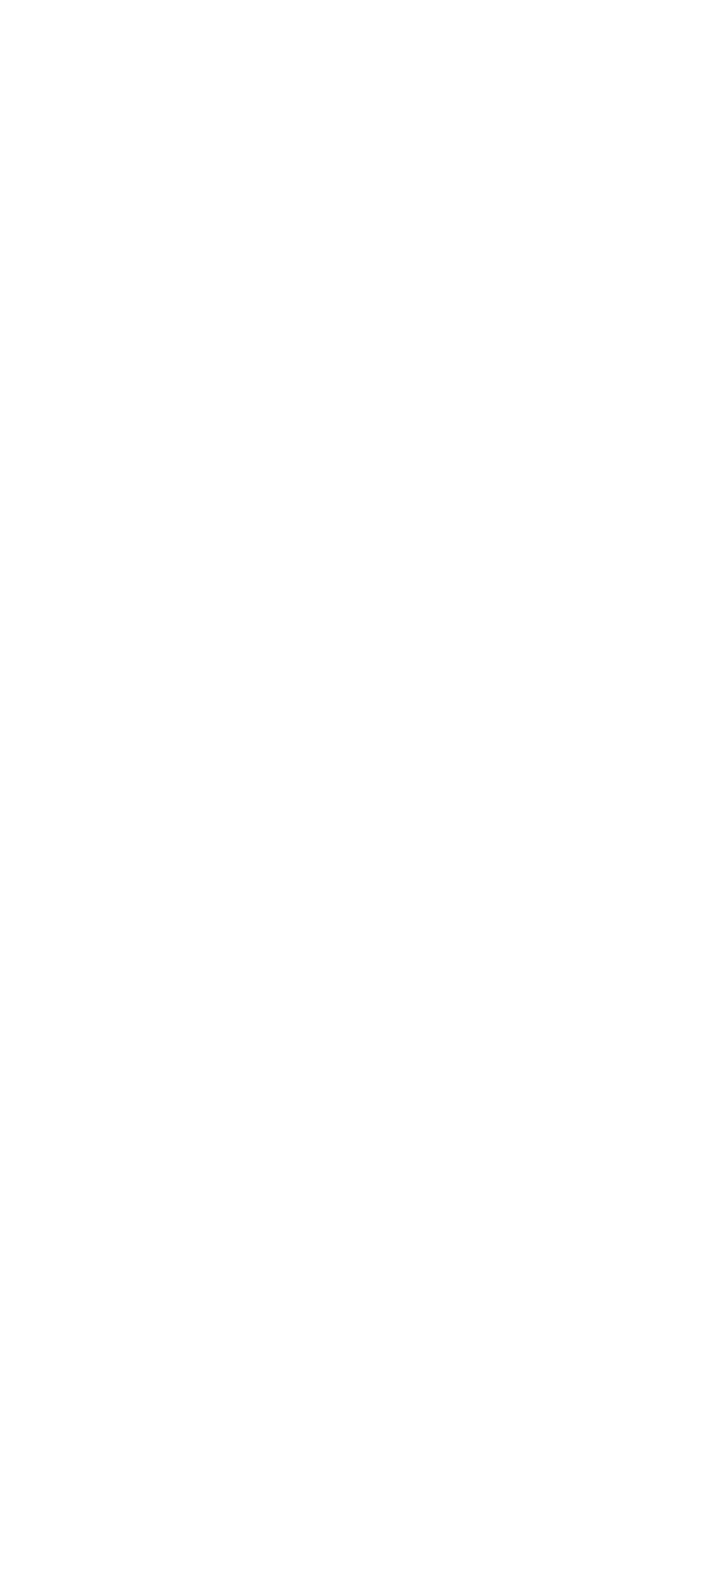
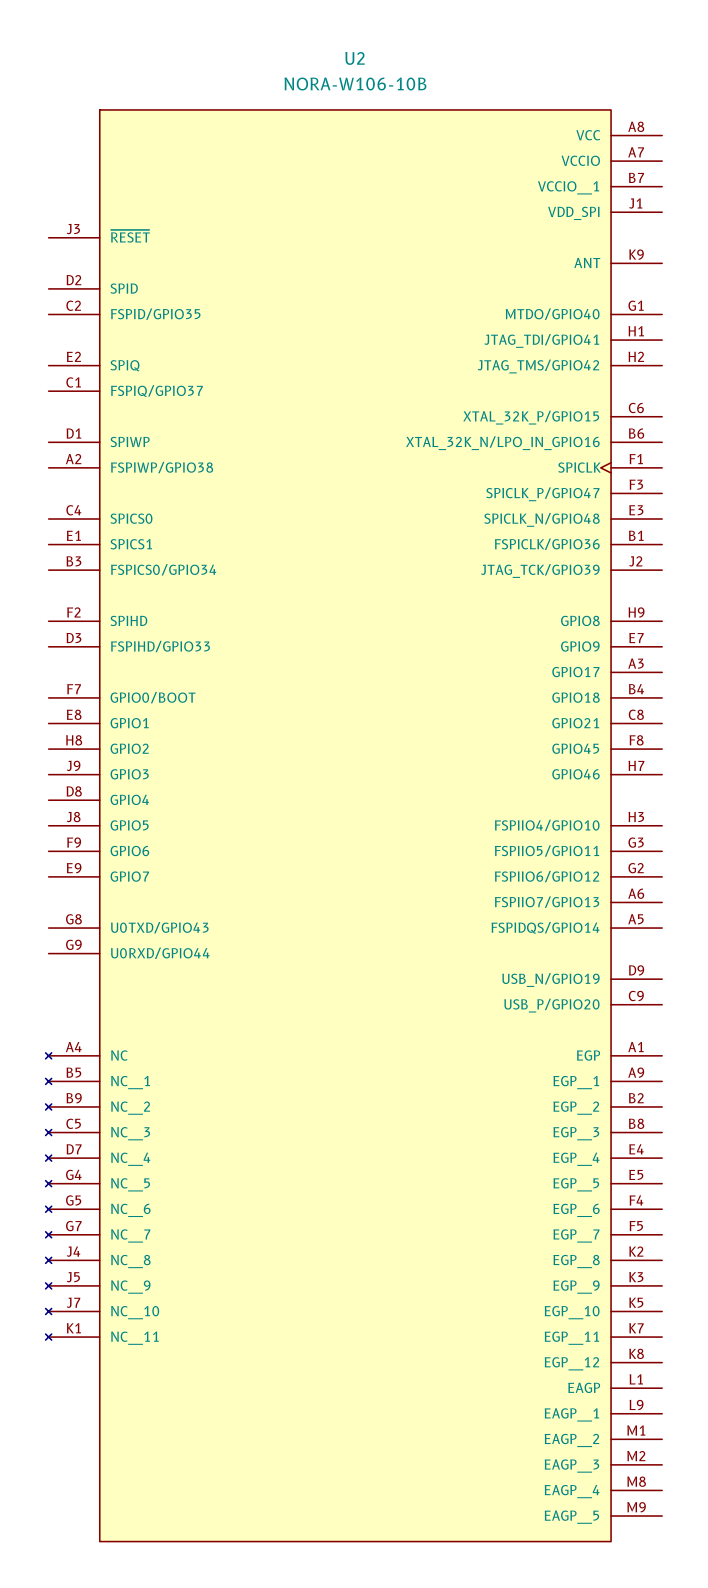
U2: none -> NORA-W106-10B (353, 825)

